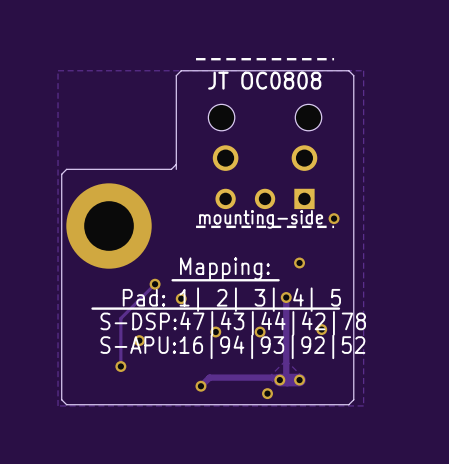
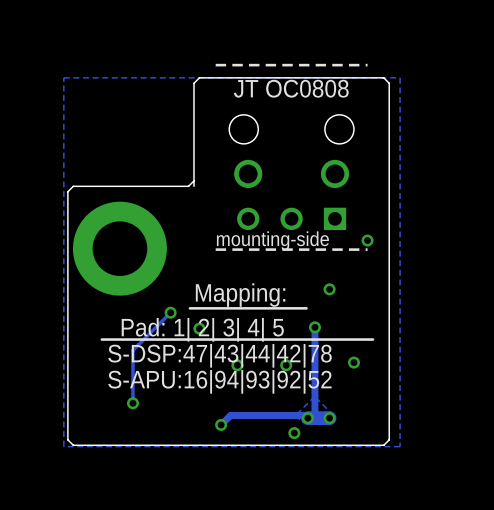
via: (139, 340) -> none

